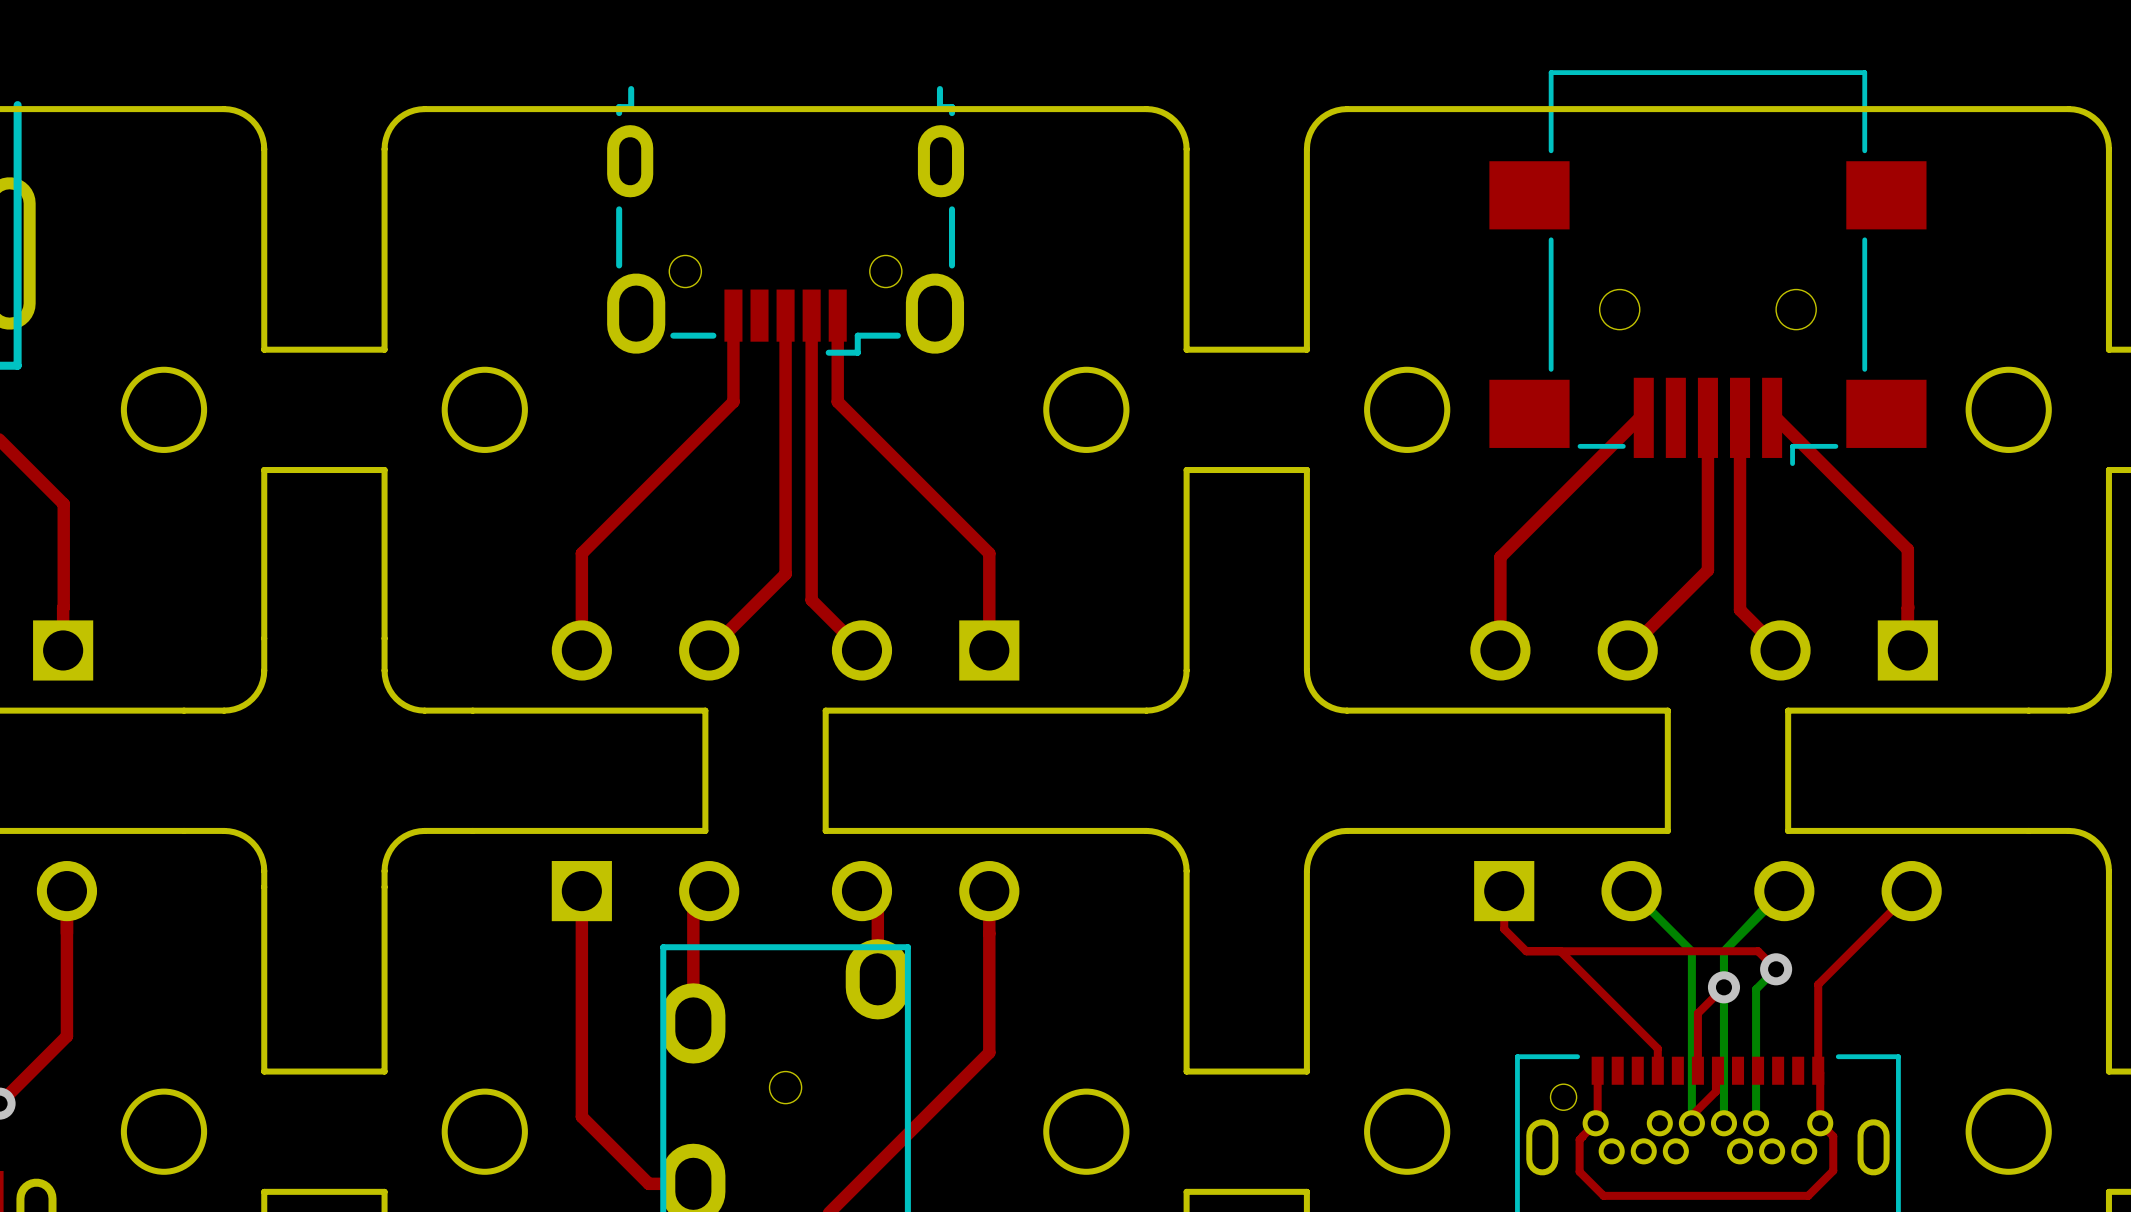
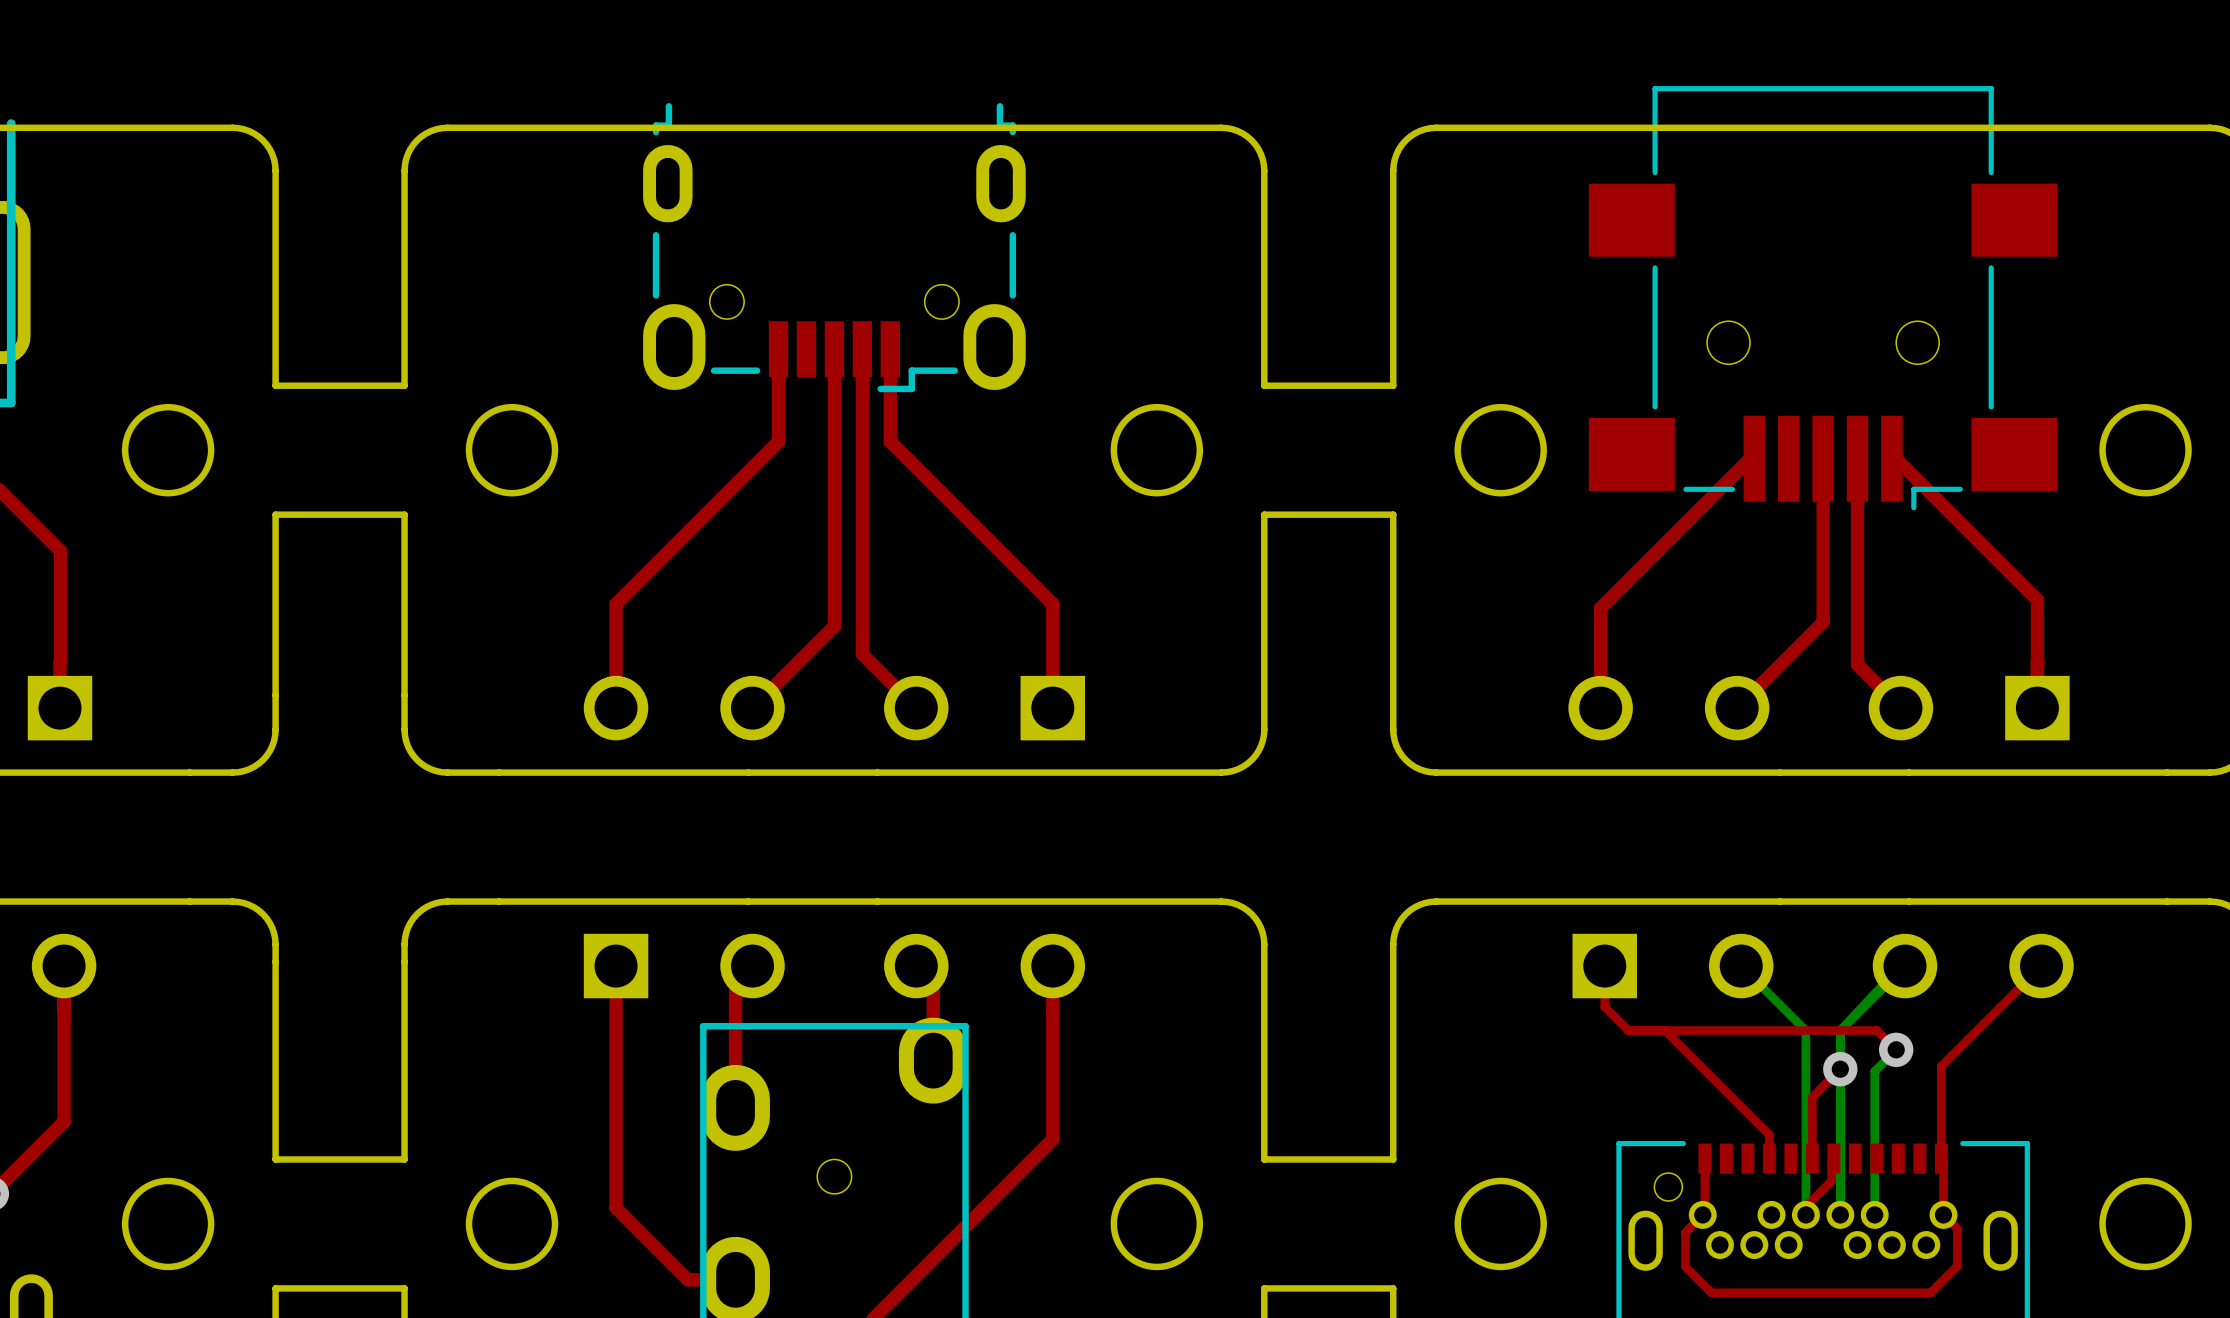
board edge: (705, 710) (705, 830) -> (748, 772) (877, 772)
board edge: (825, 710) (825, 830) -> (748, 901) (877, 901)
board edge: (1667, 710) (1667, 830) -> (1780, 772) (1909, 772)
board edge: (1788, 710) (1788, 830) -> (1780, 901) (1909, 901)

